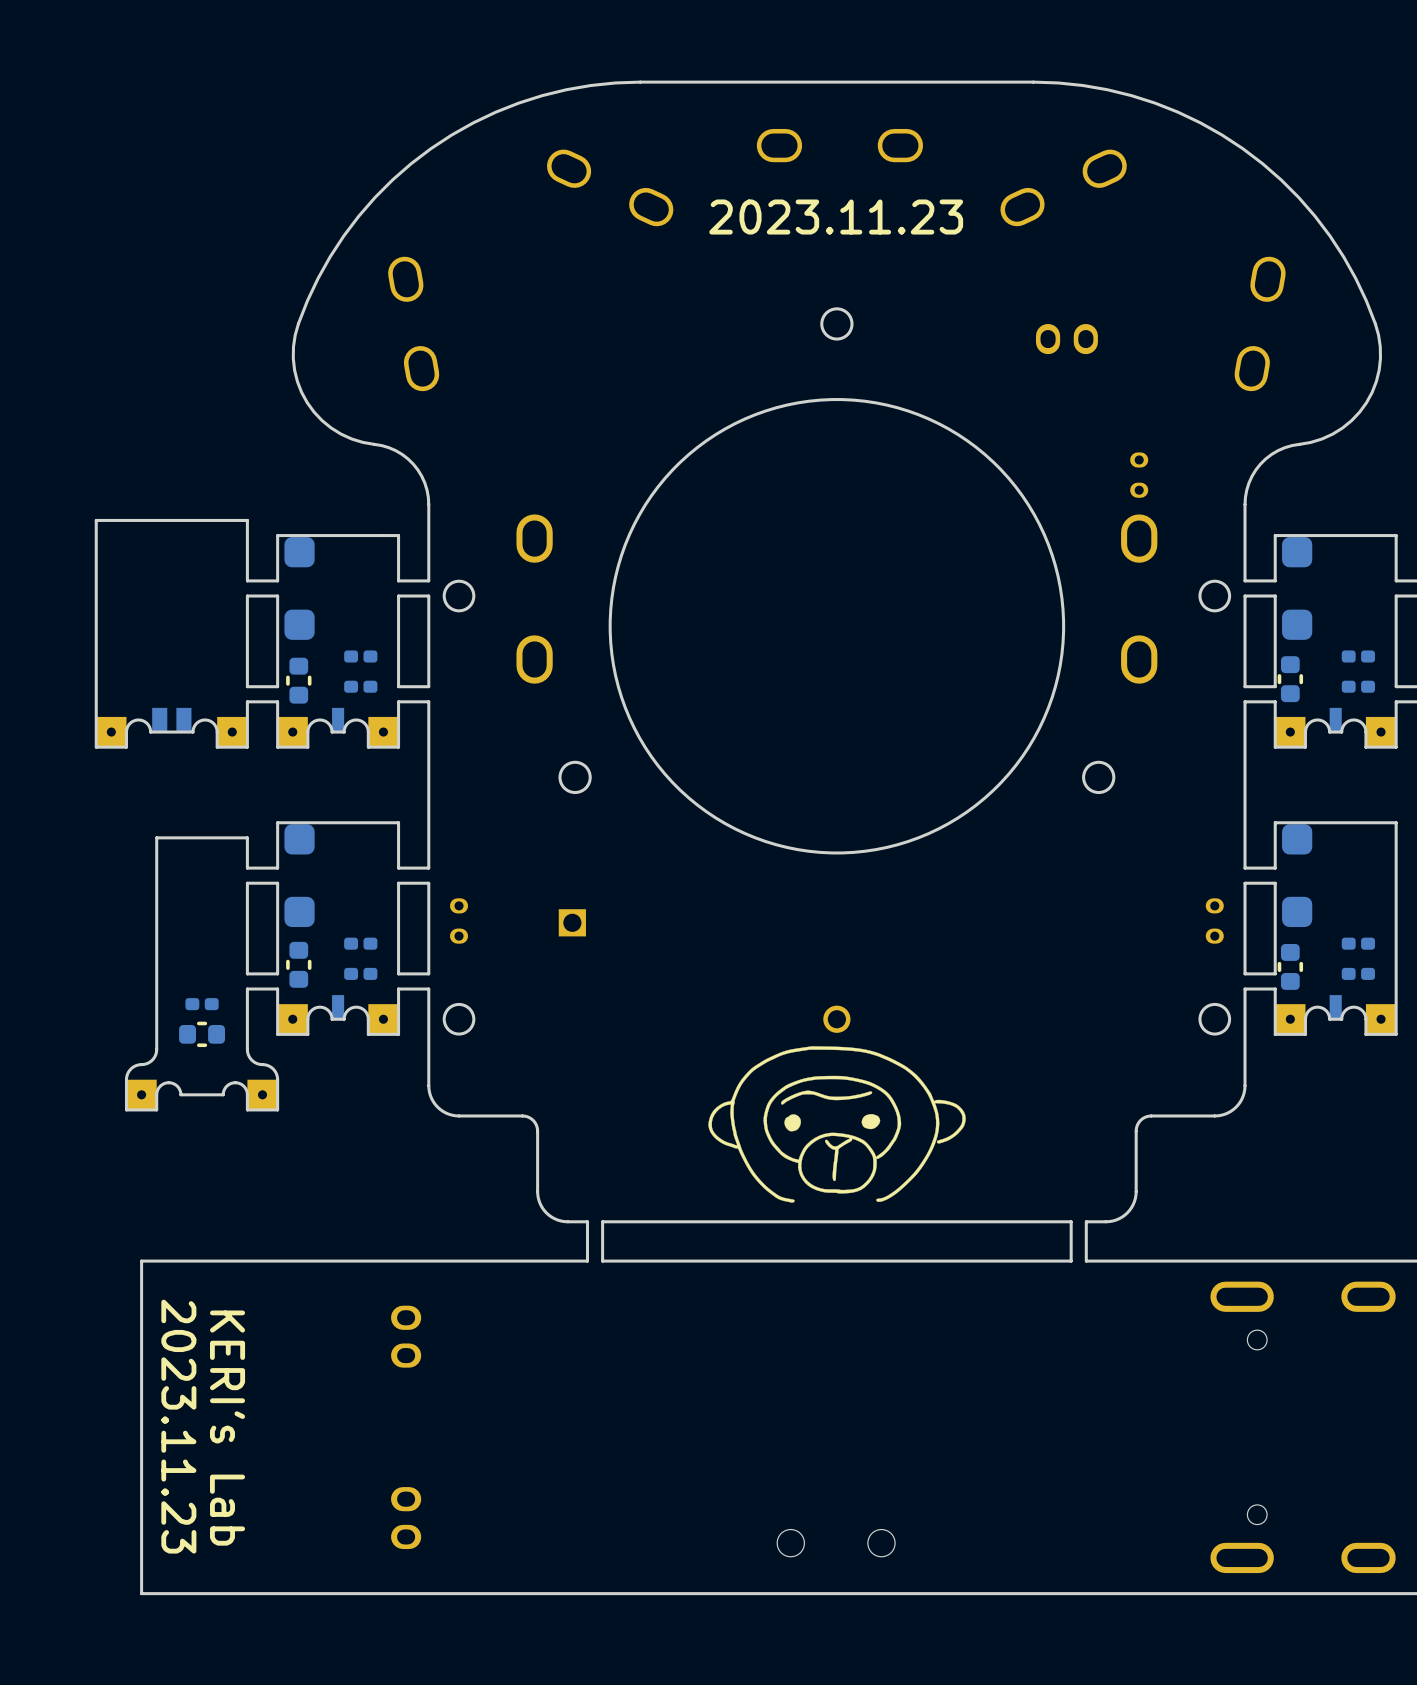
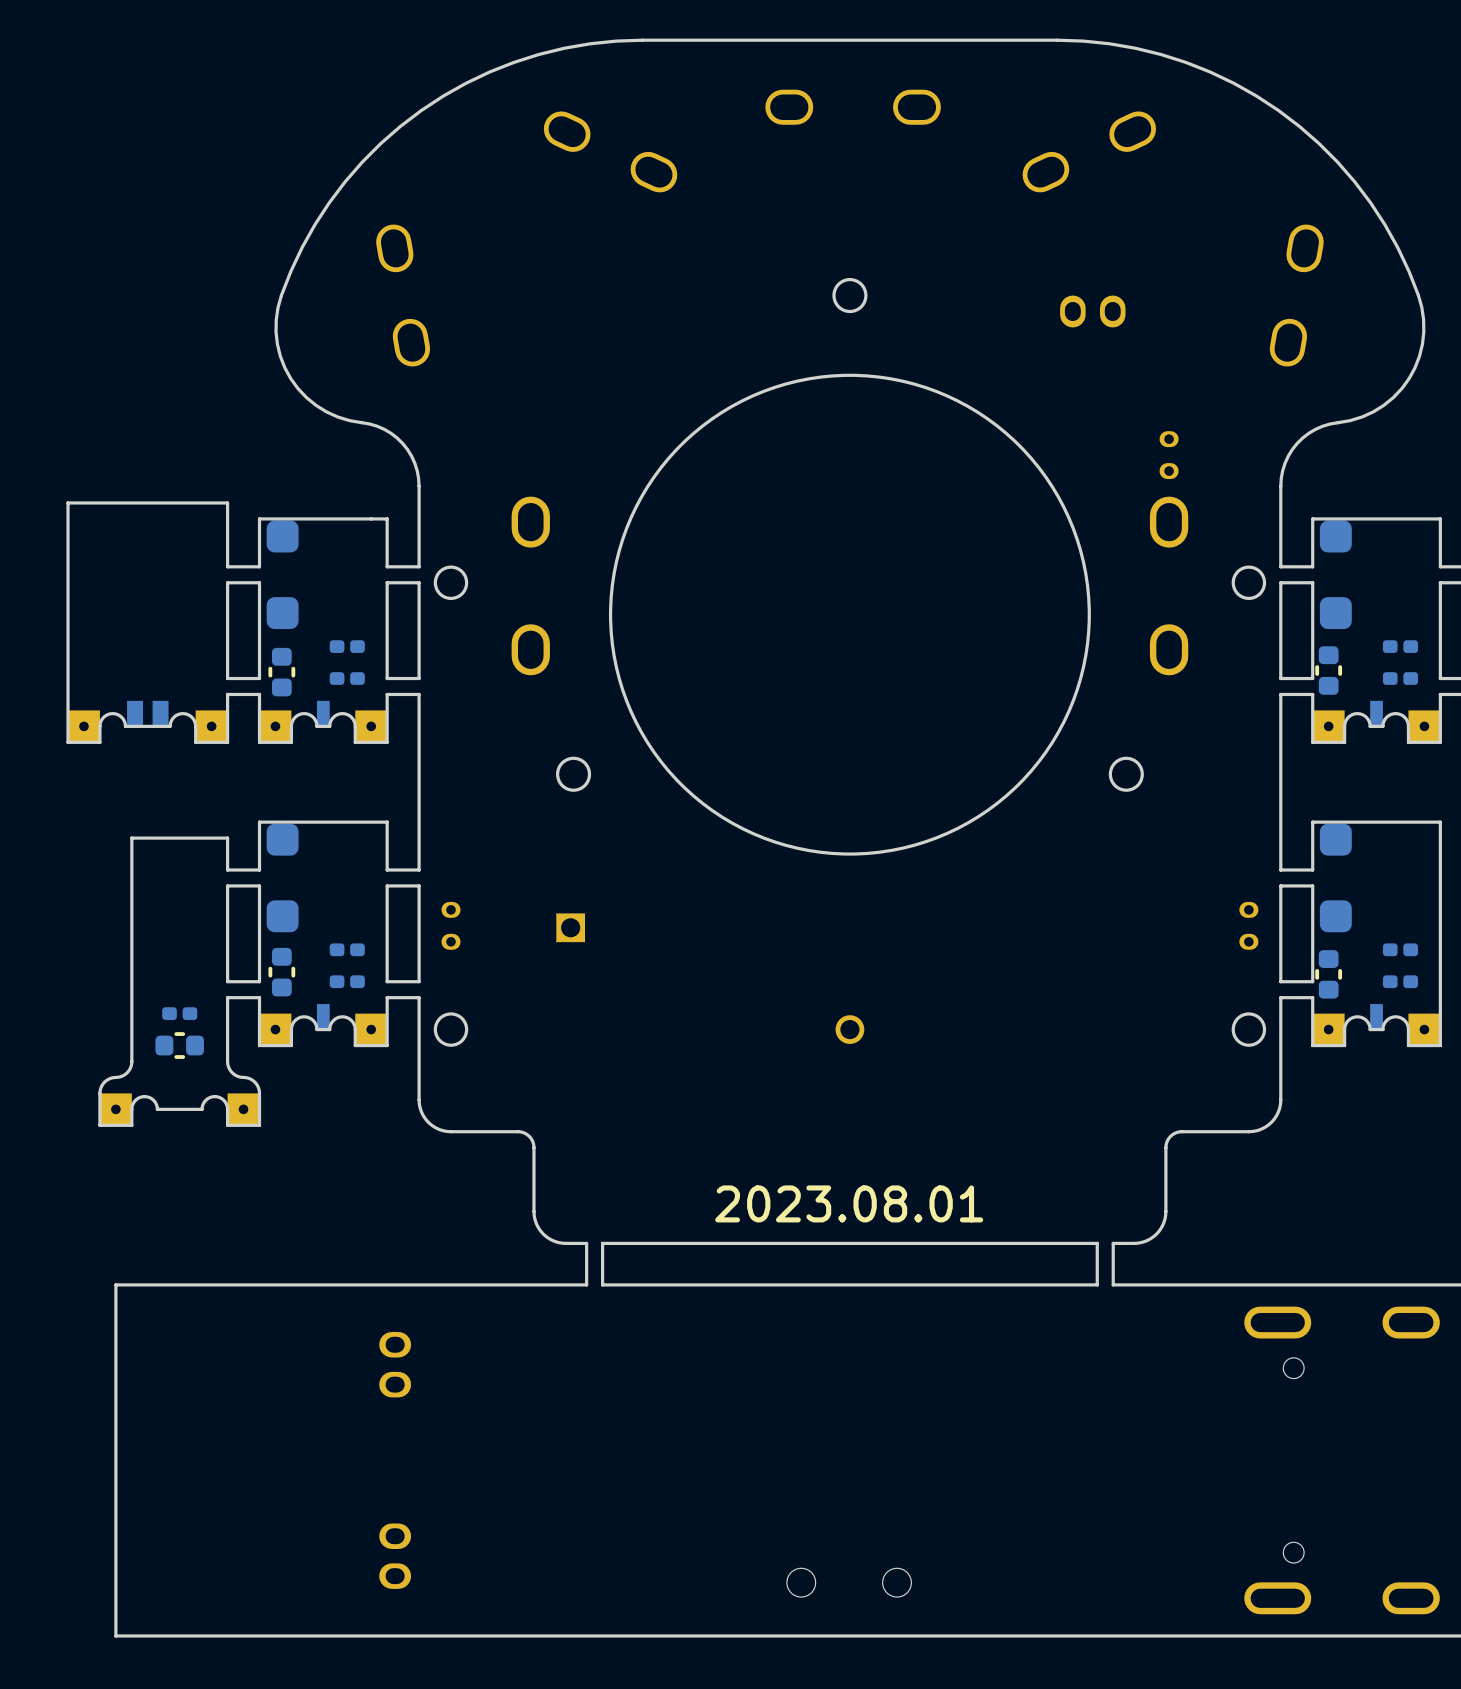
text: 2023.11.23 (836, 217) -> none
drawing: [708, 1046, 966, 1203] -> none
text: none -> 2023.08.01 (849, 1203)
text: 2023.11.23 (178, 1426) -> none
text: KERI's Lab (227, 1428) -> none

